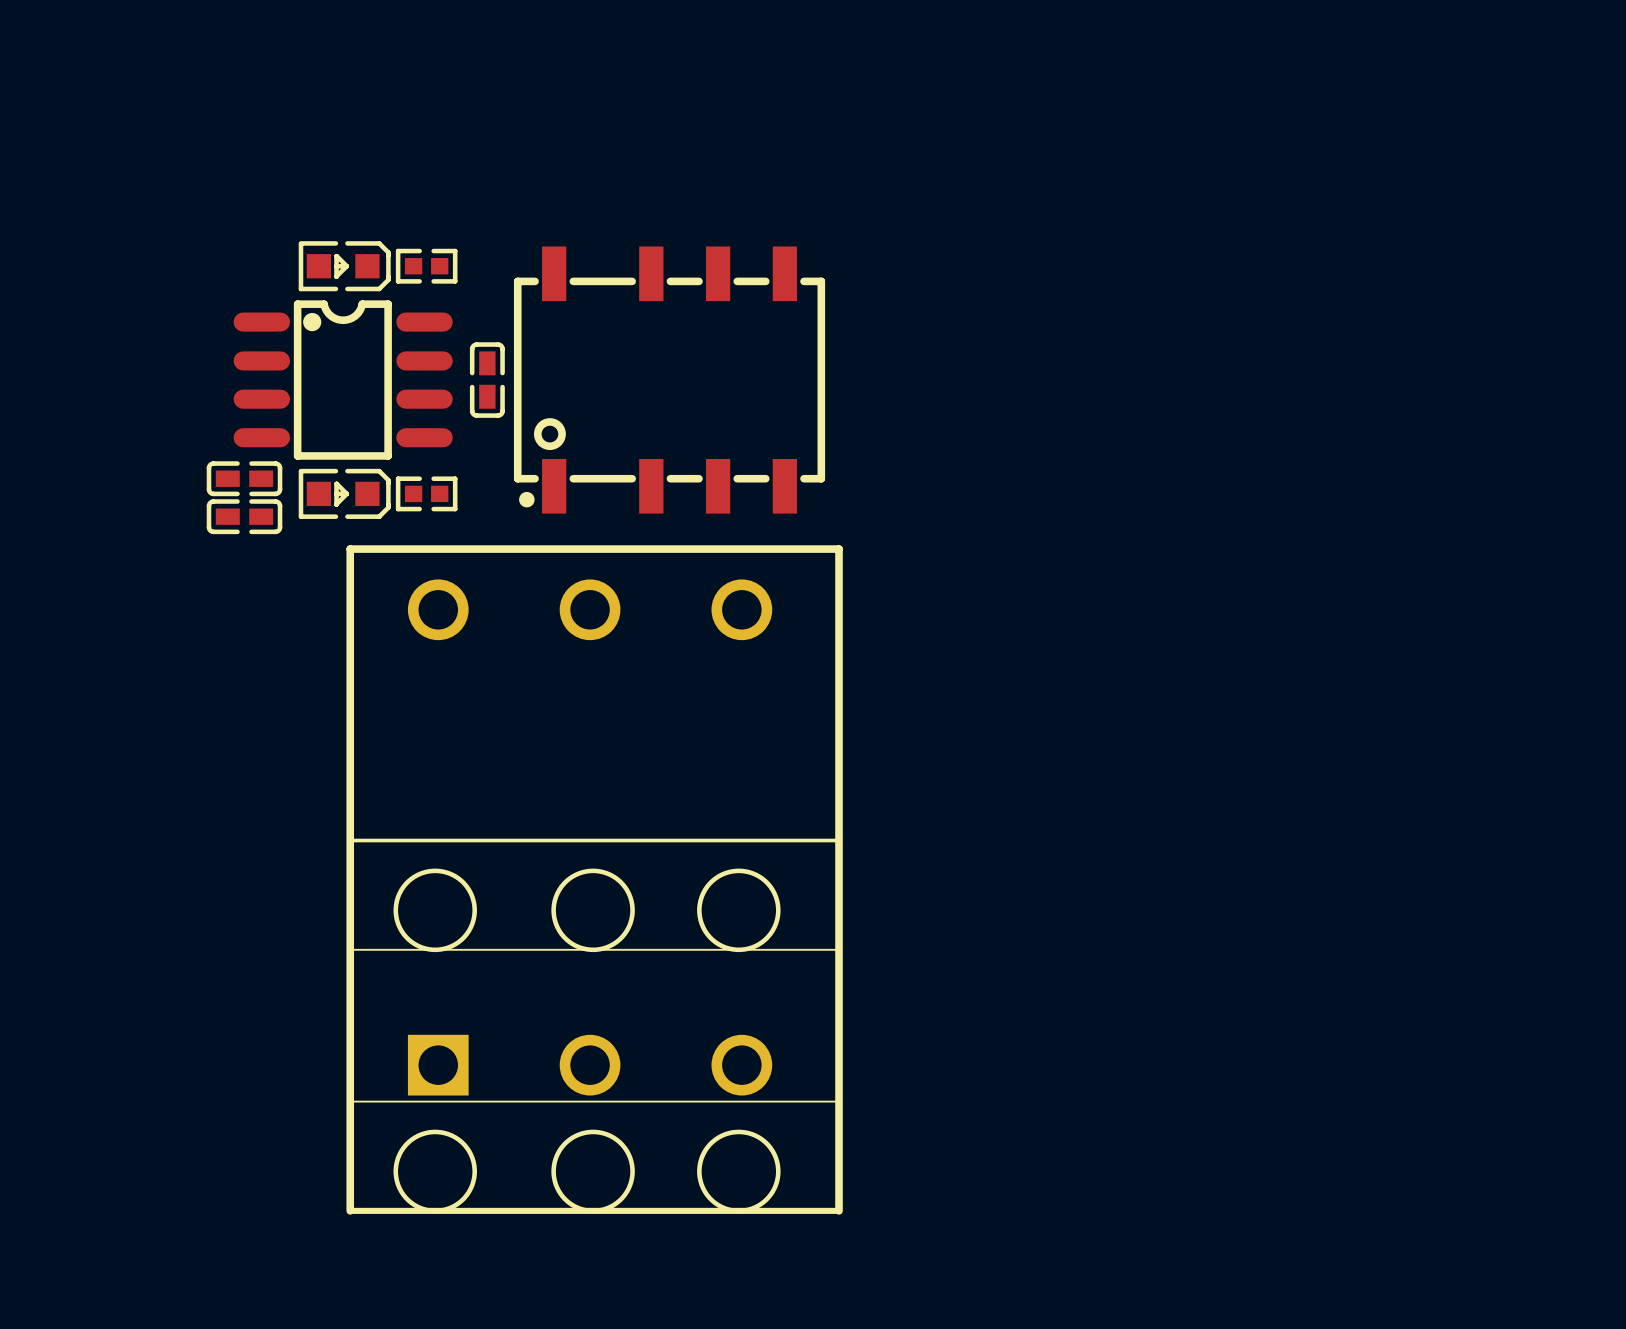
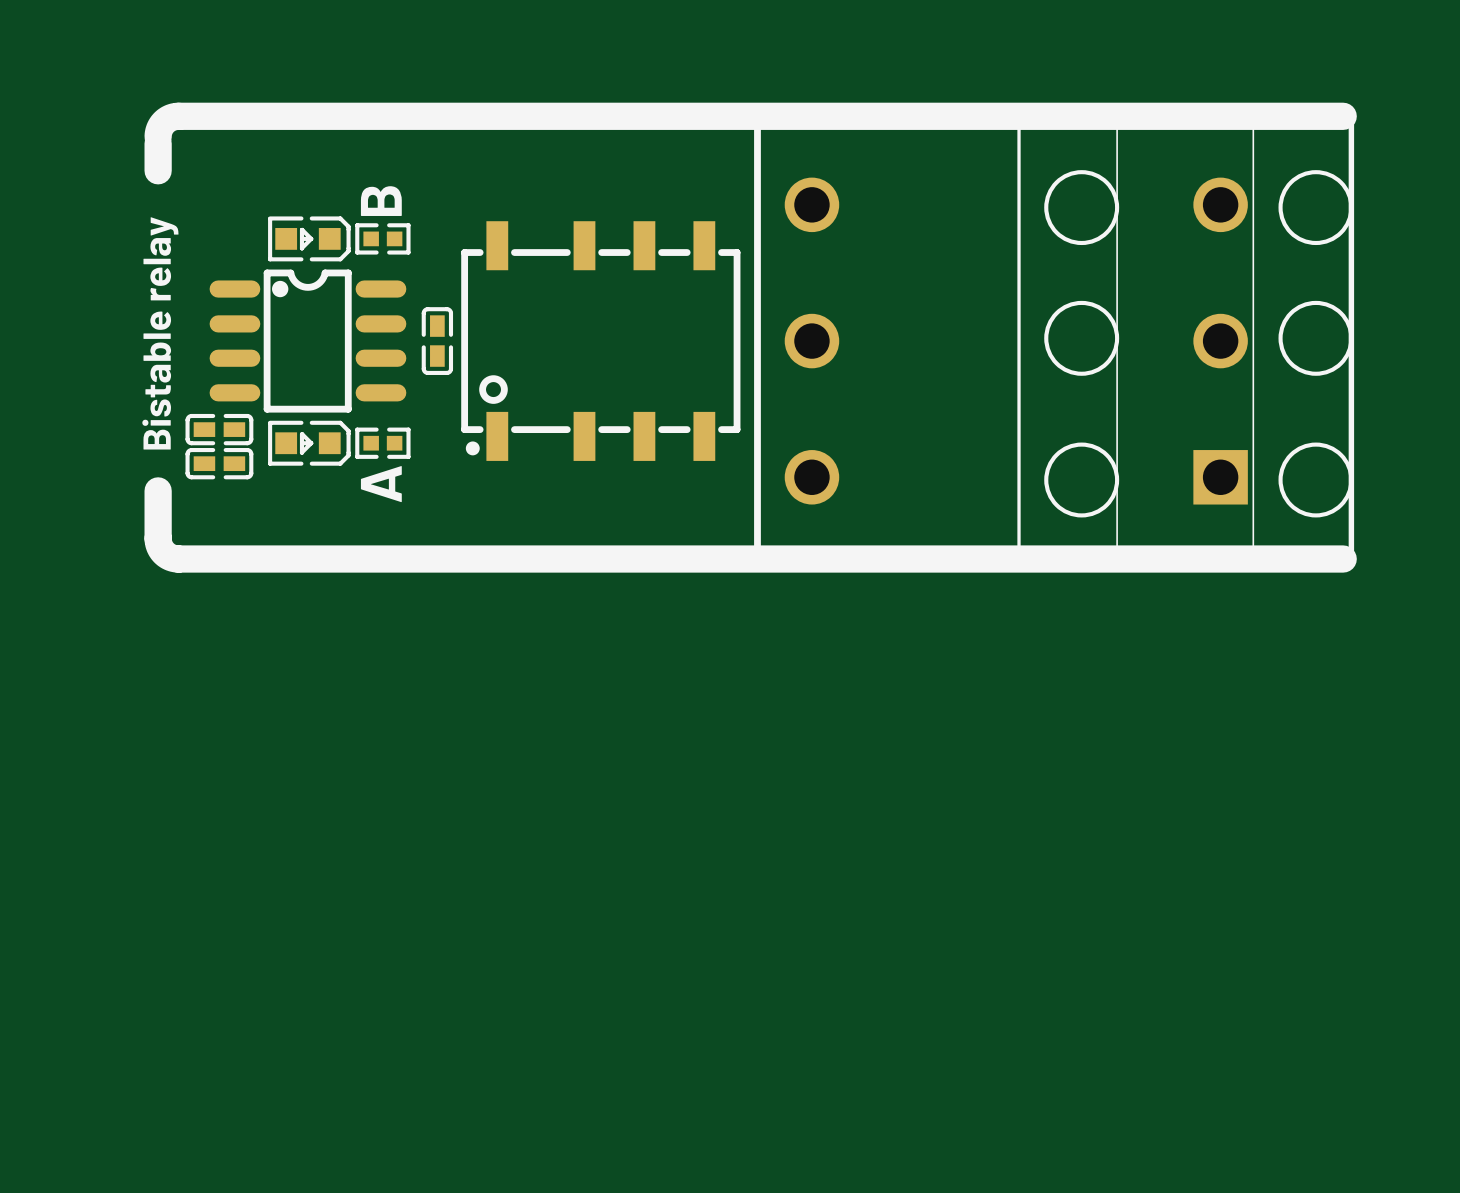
line: none -> (1343, 116) (178, 116) (170, 117) (164, 122) (159, 128) (158, 136)
line: none -> (158, 143) (158, 170)
text: none -> B (381, 201)
text: none -> Bistable relay (160, 333)
part: none -> (1054, 336)
text: none -> A (381, 484)
line: none -> (158, 490) (158, 543) (166, 554) (178, 559) (1343, 559)
part: (594, 879) -> none

